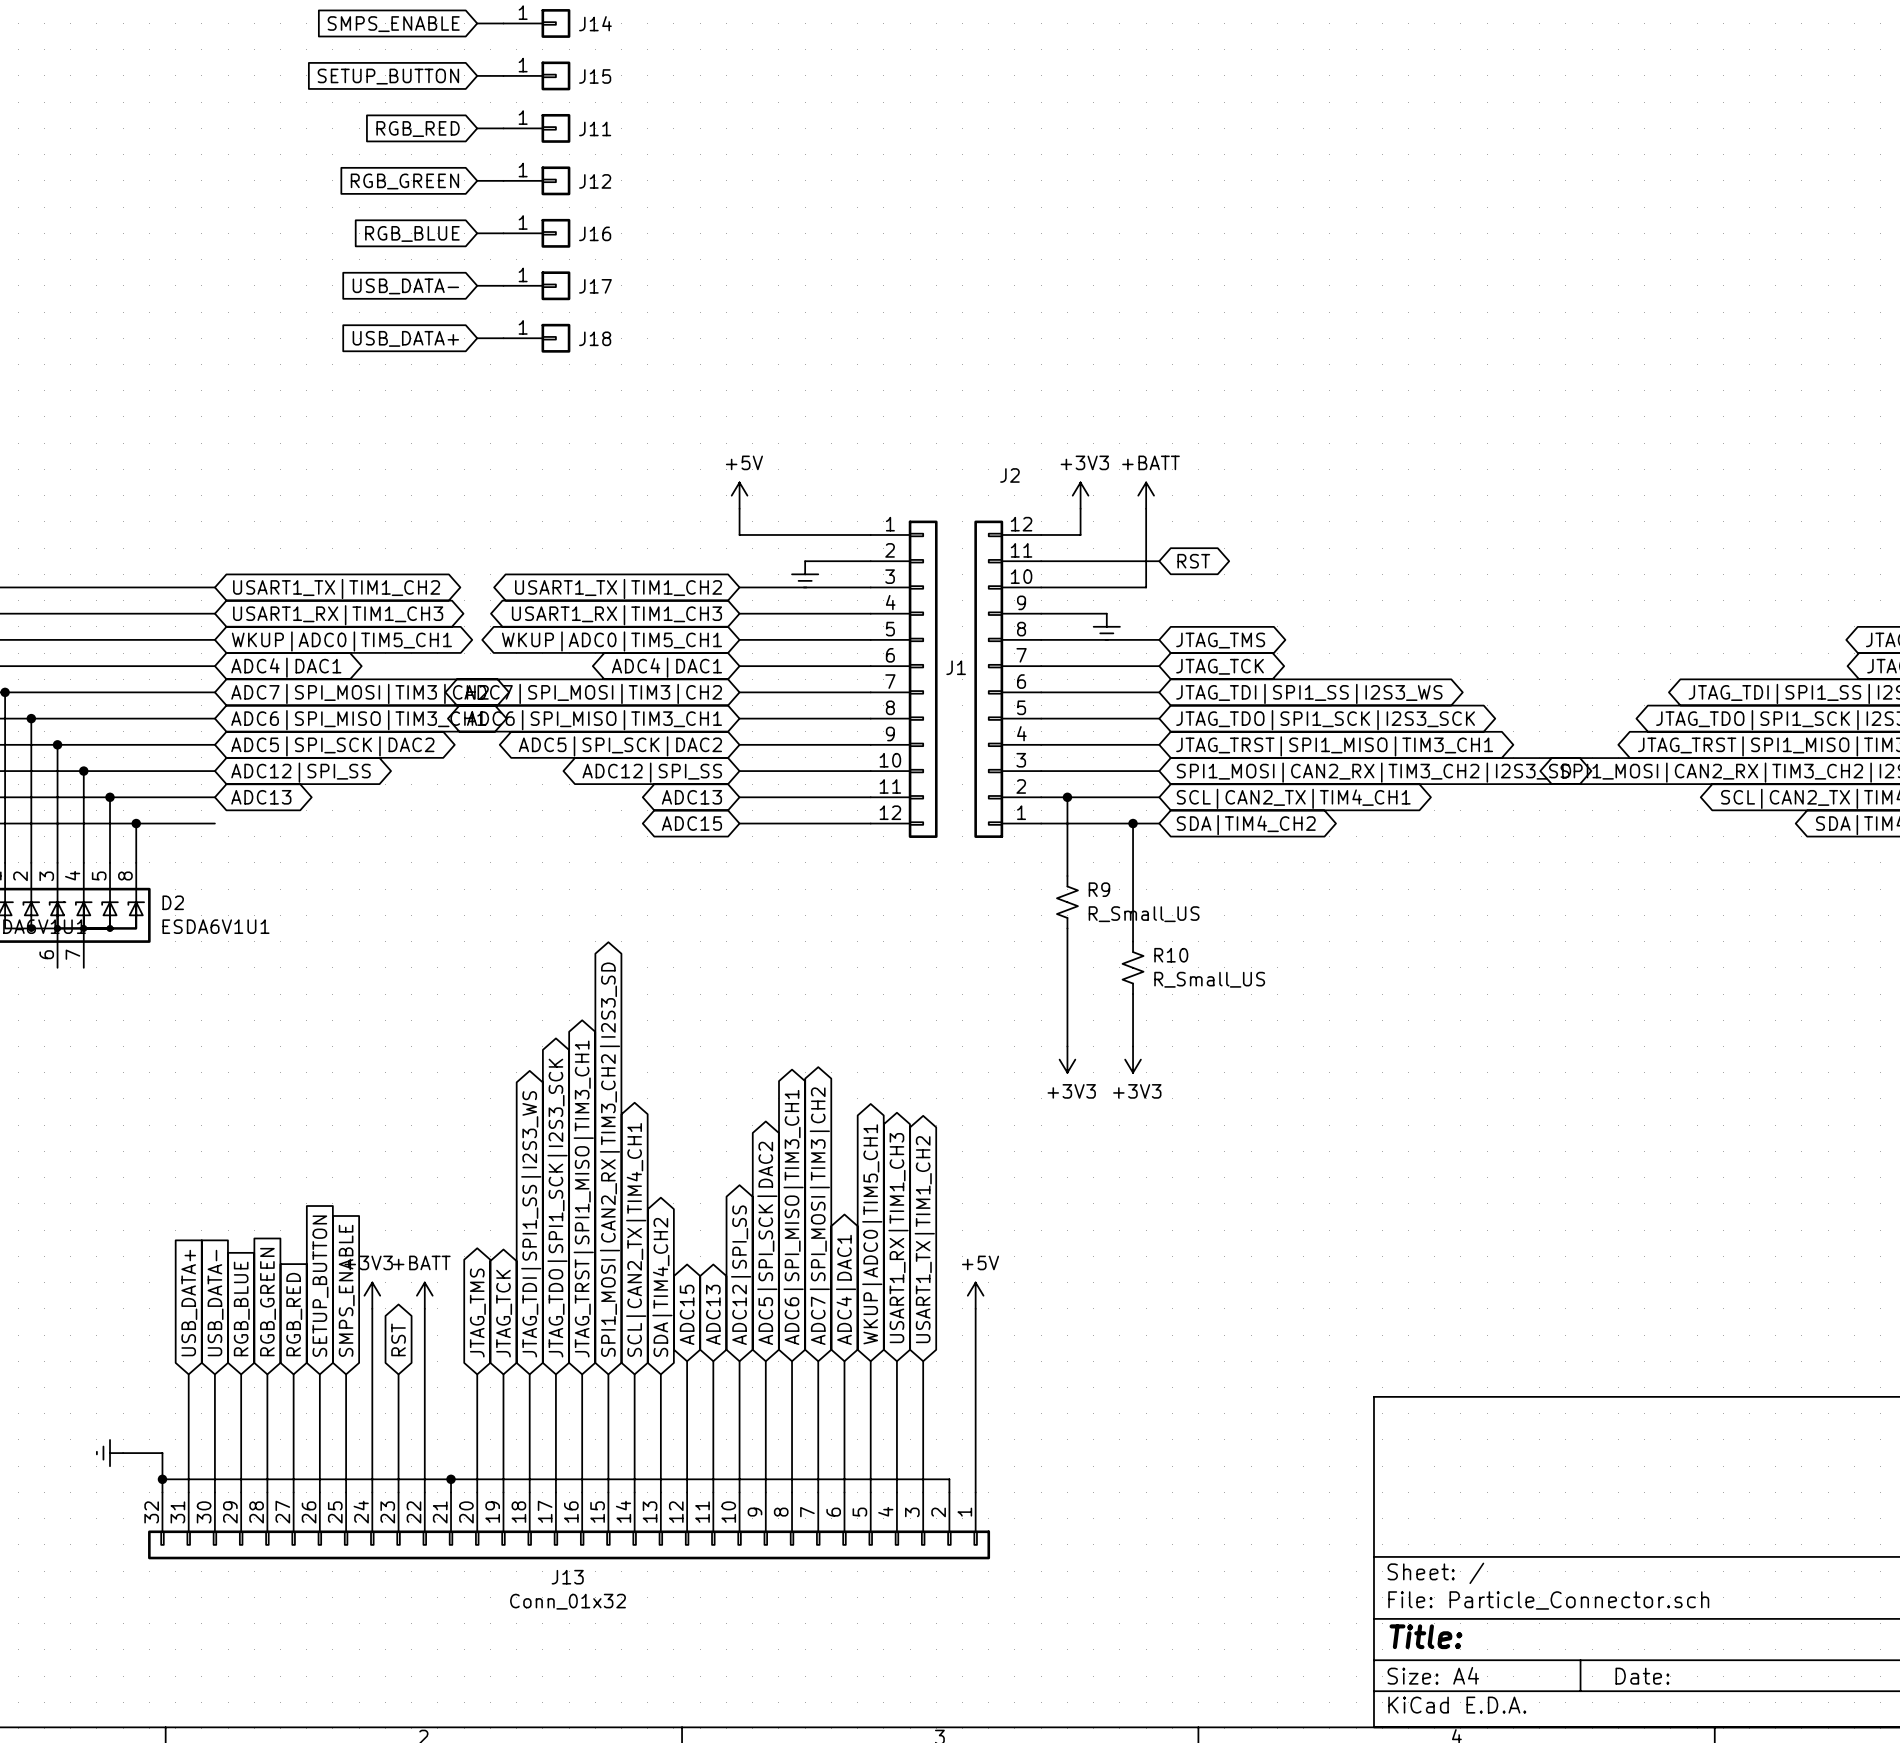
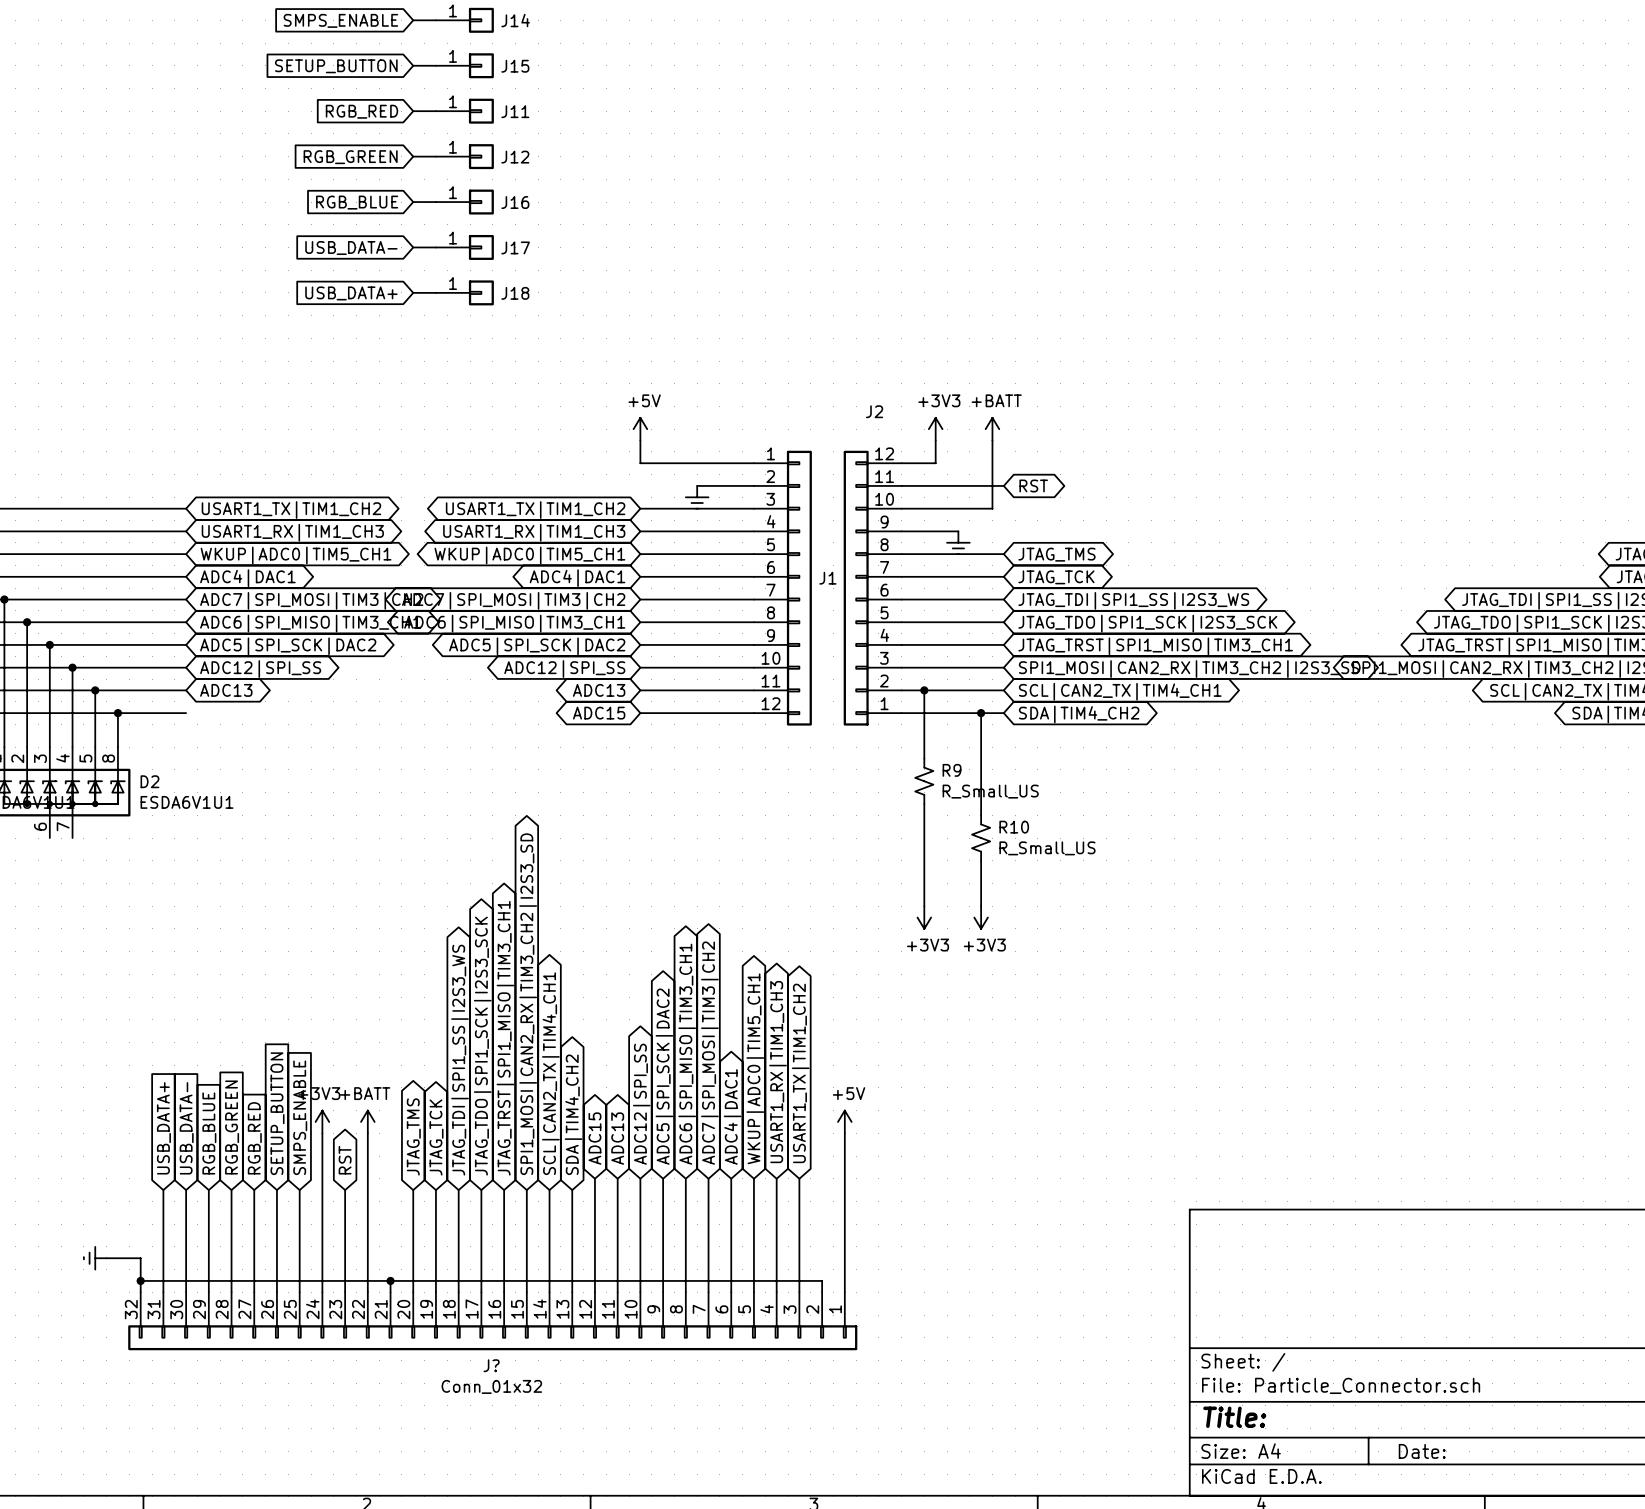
J13 name: J13 (567, 1577) -> J? (491, 1365)

